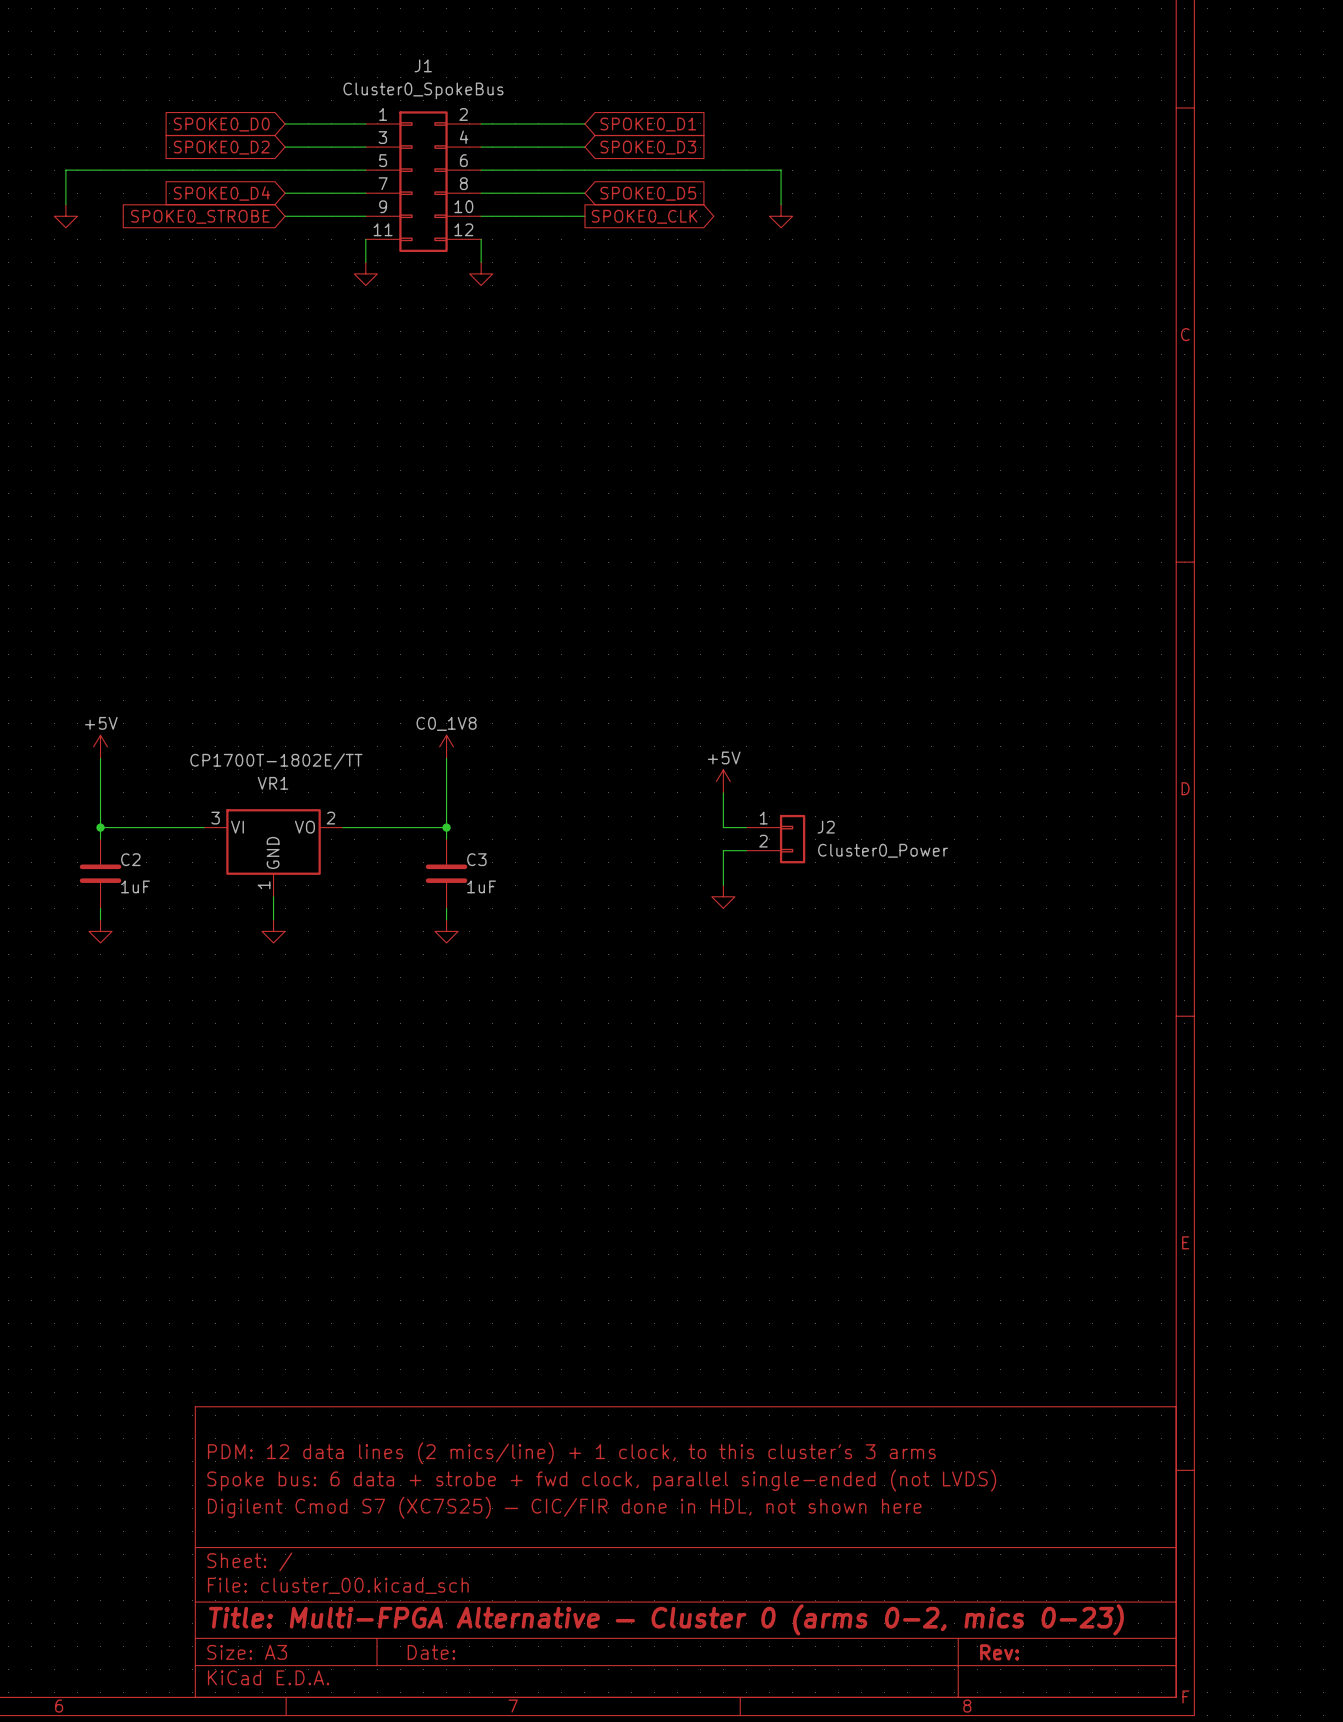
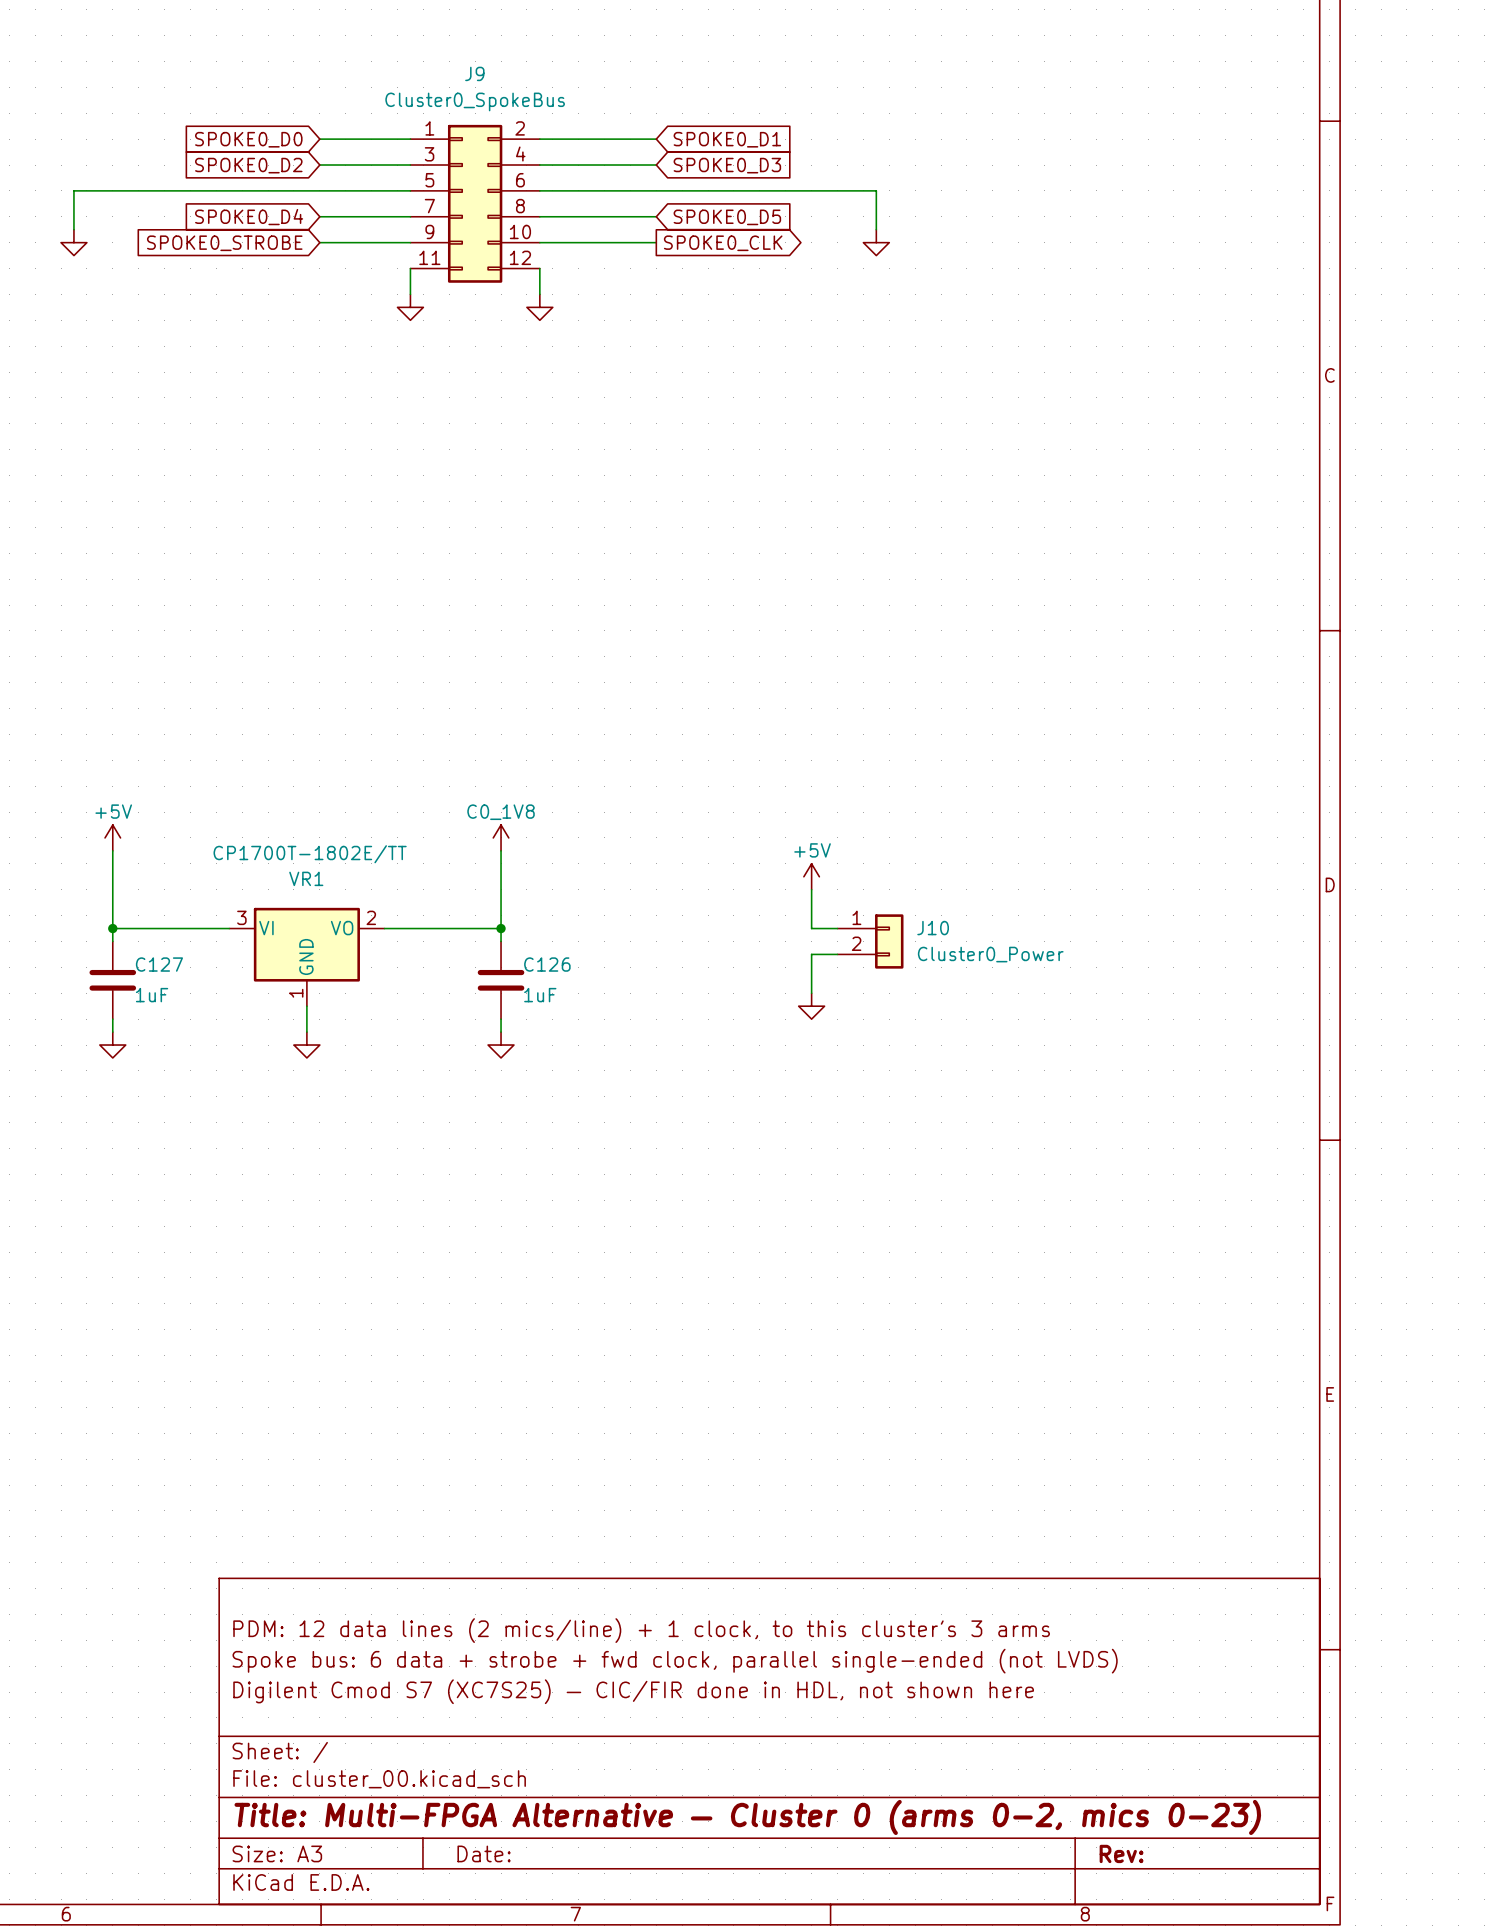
J1 name: J1 (423, 65) -> J9 (474, 73)
J2 name: J2 (826, 827) -> J10 (933, 928)
C2 name: C2 (130, 859) -> C127 (159, 964)
C3 name: C3 (476, 859) -> C126 (547, 964)

